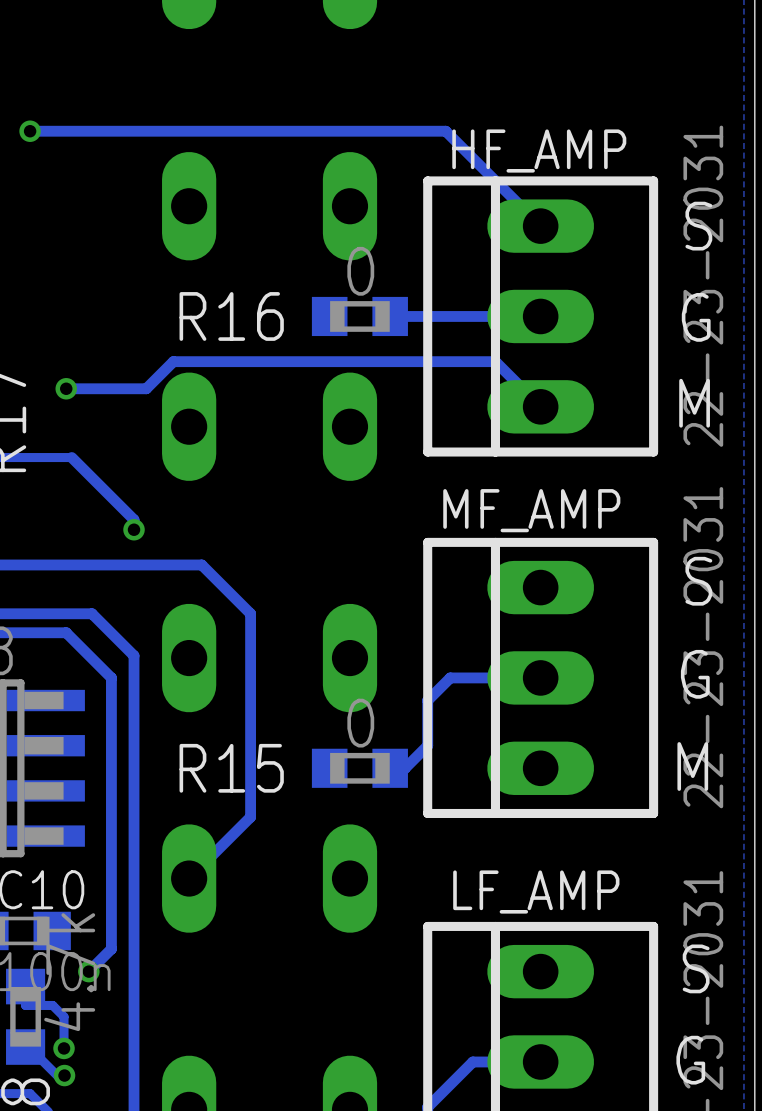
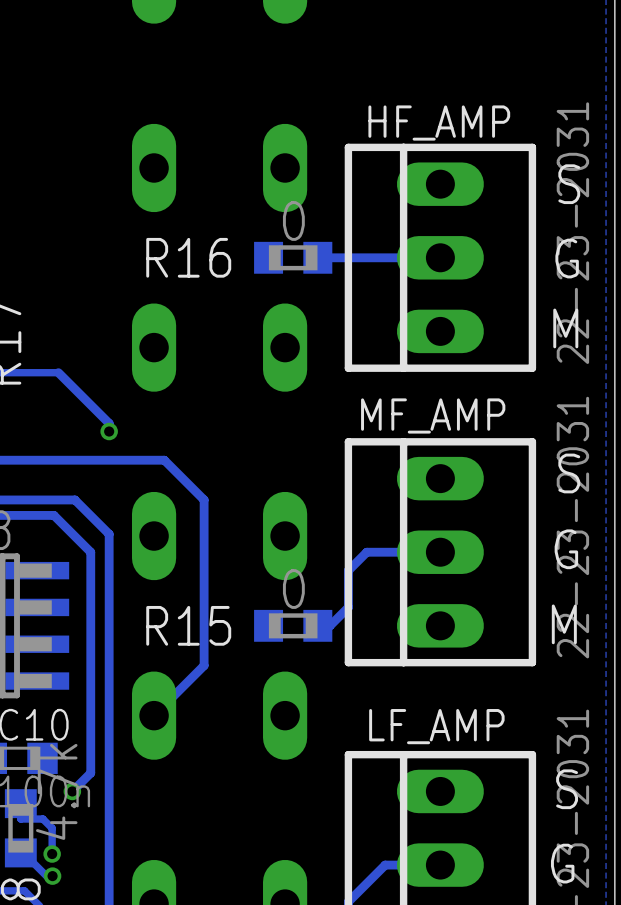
track: (30, 131) (445, 131) (540, 226) -> none
via: (30, 131) -> none
track: (66, 388) (146, 388) (173, 361) (495, 361) (540, 406) -> none
via: (66, 388) -> none

